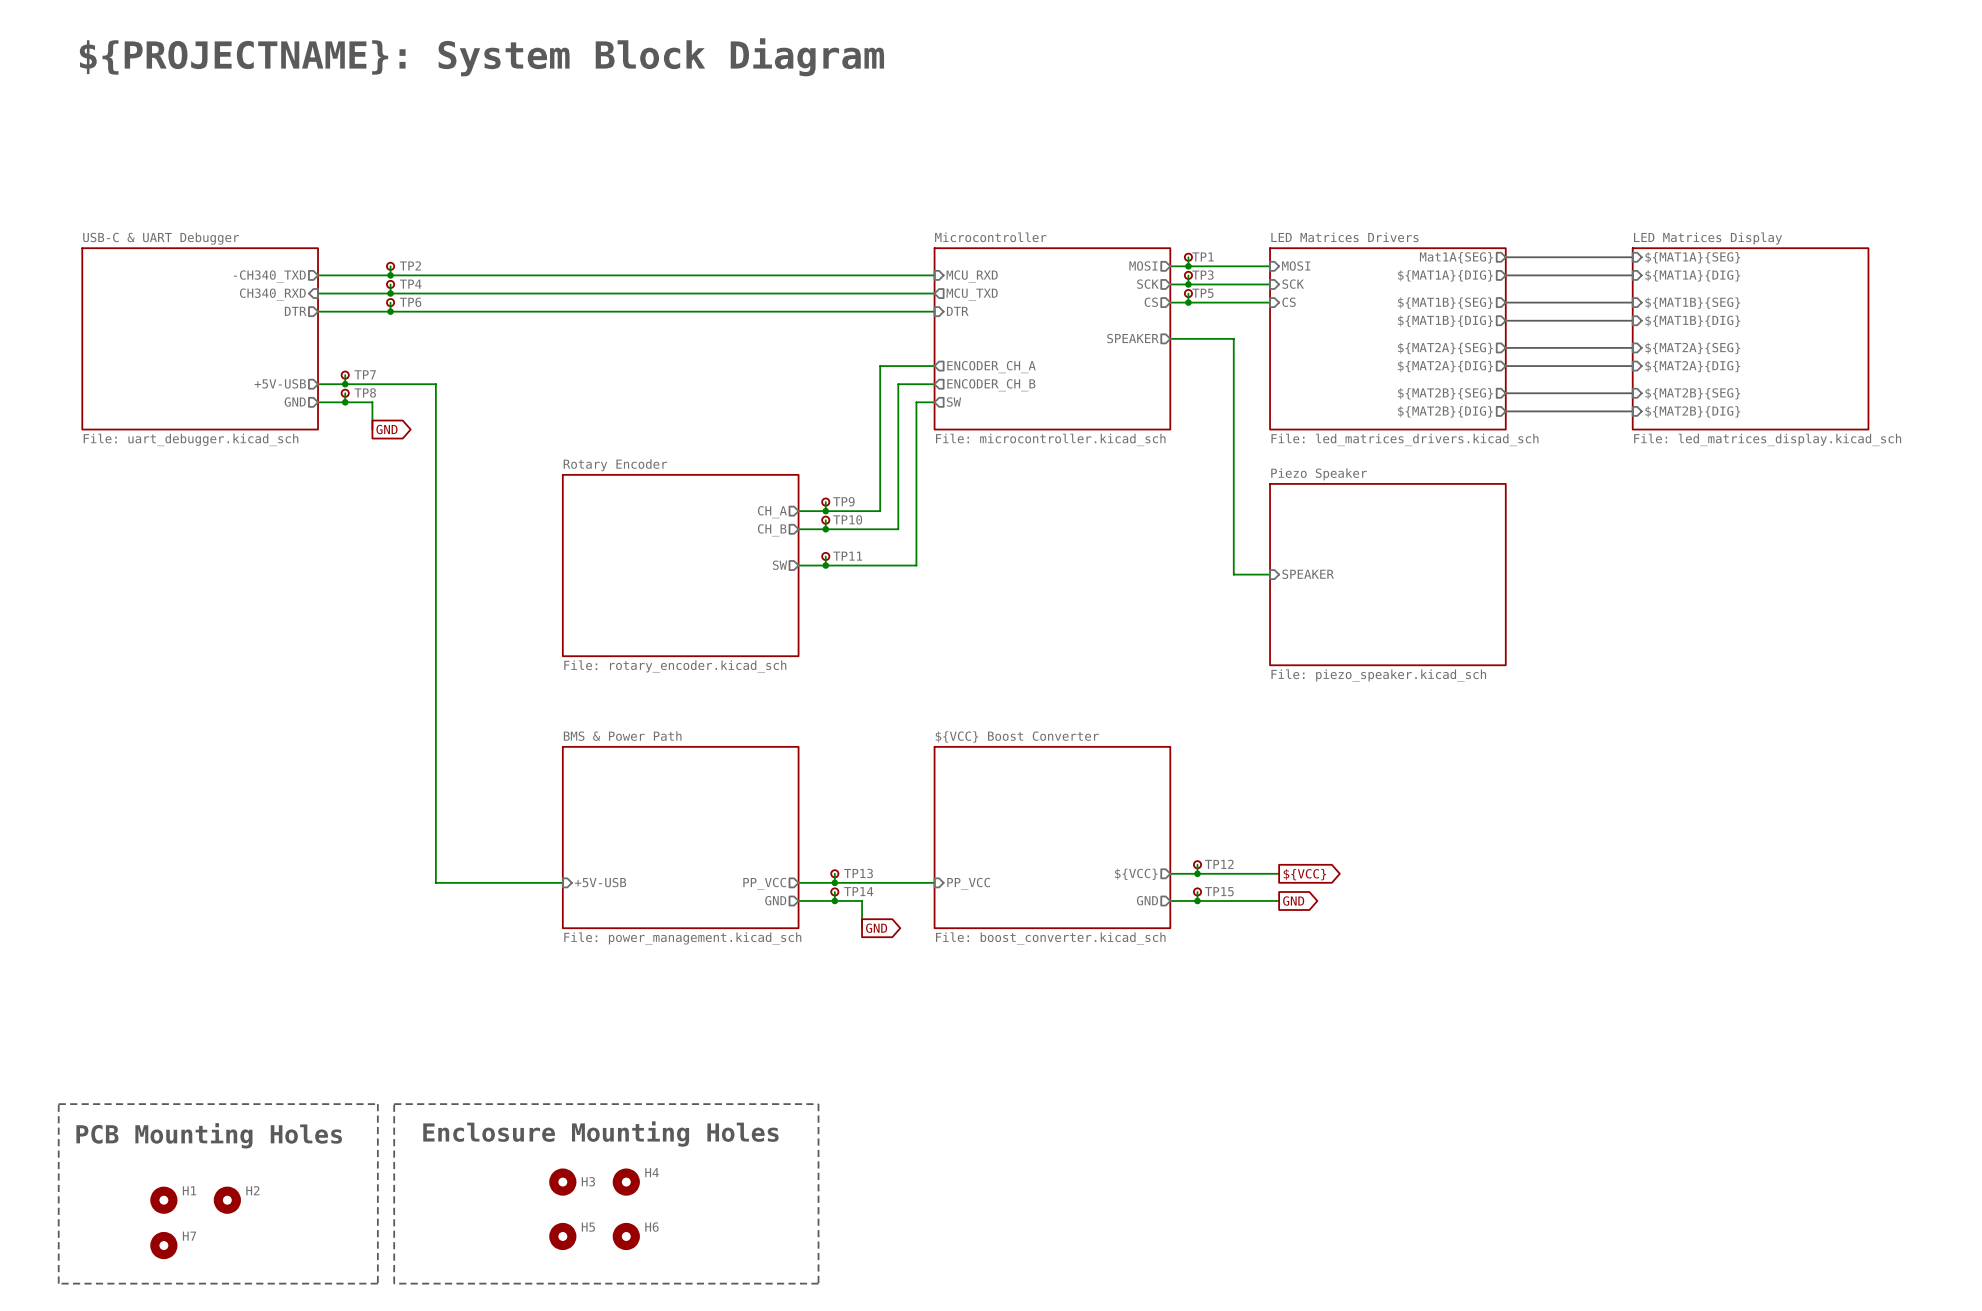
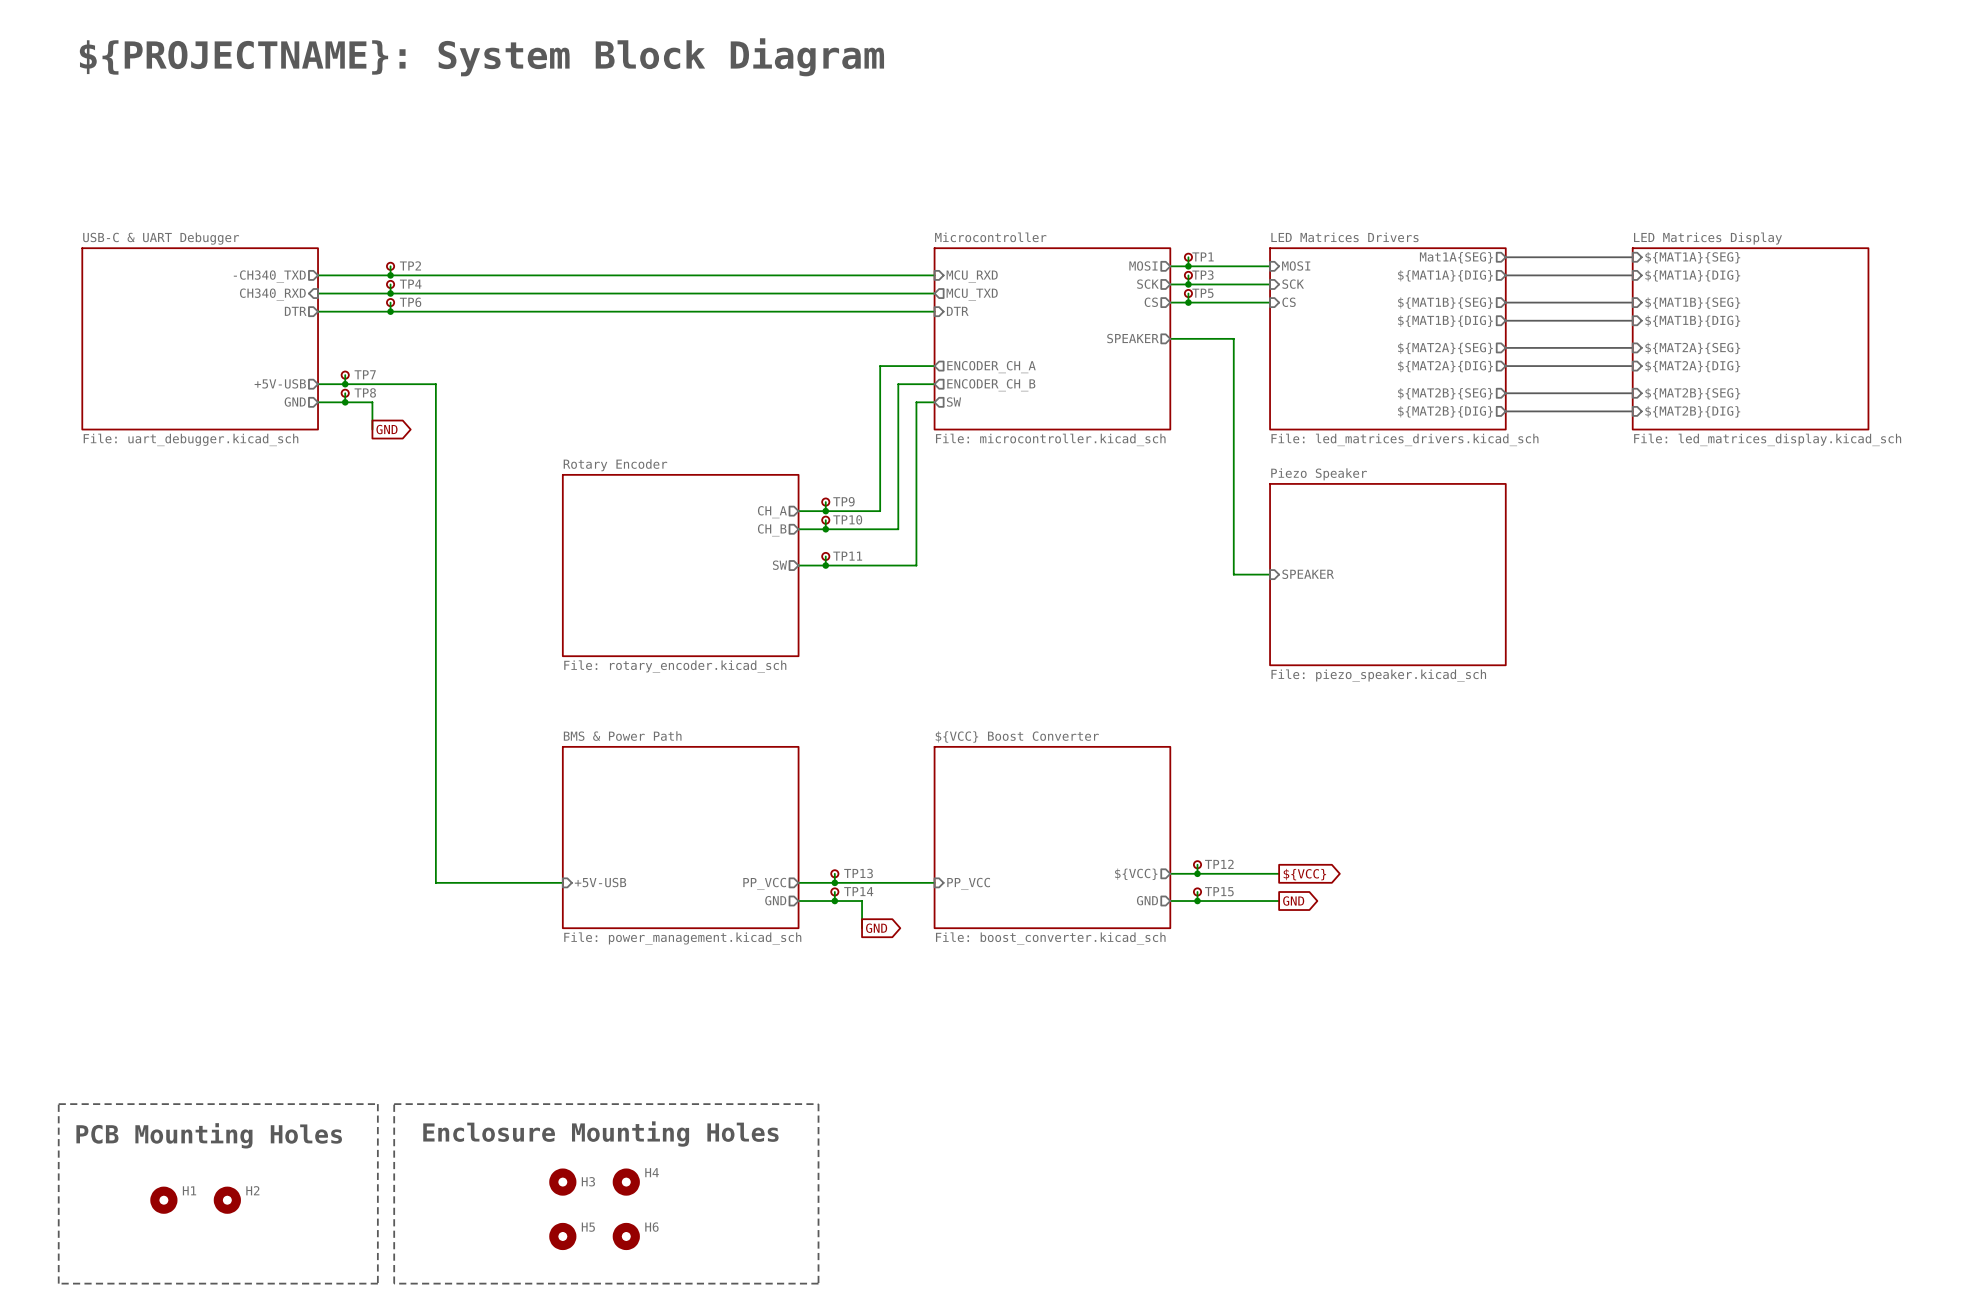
H7: (163, 1245) -> none

